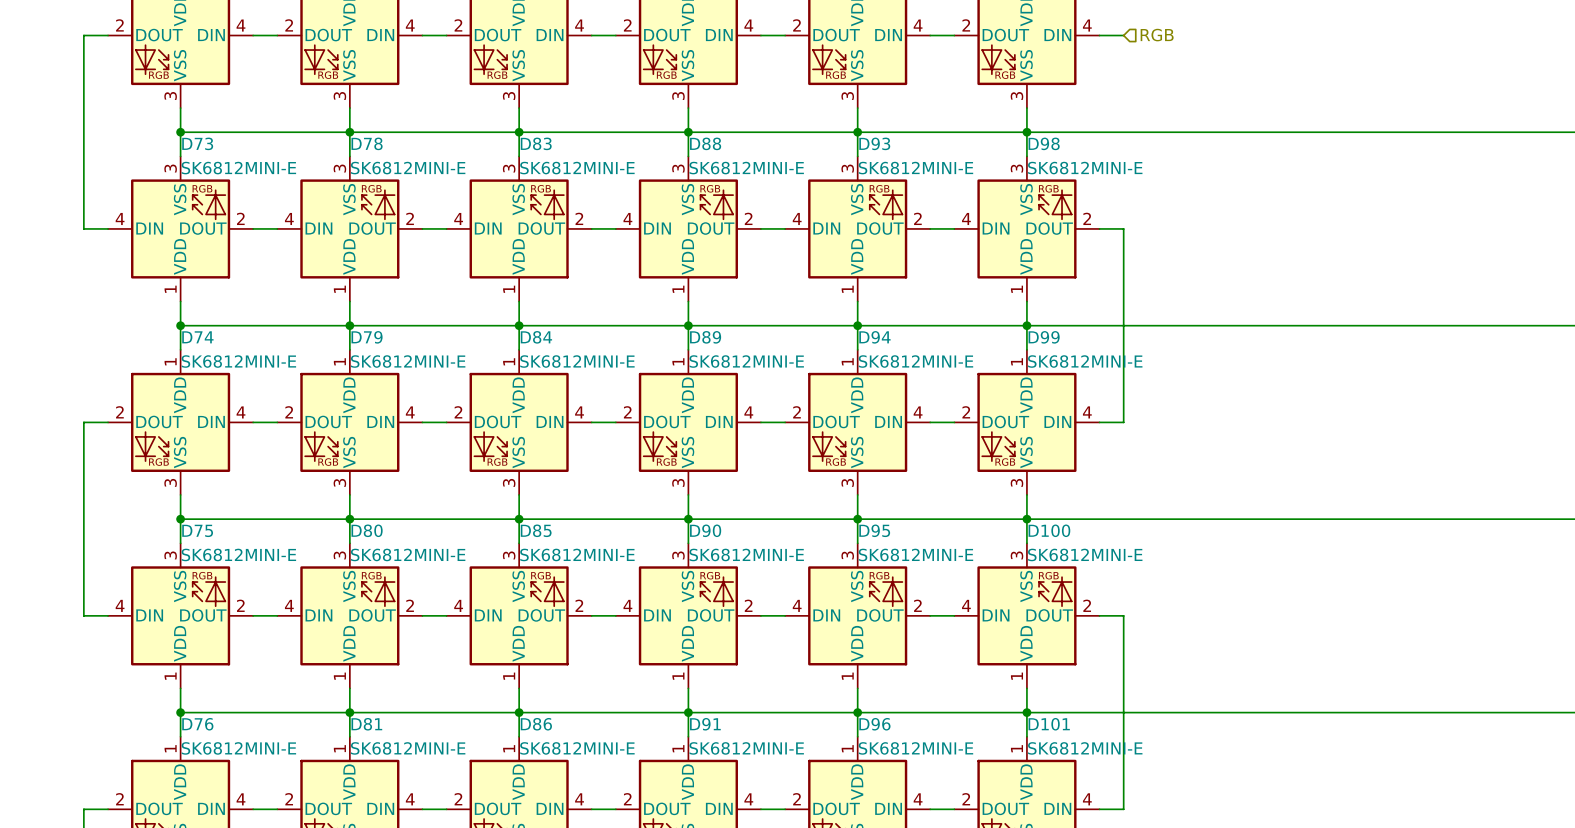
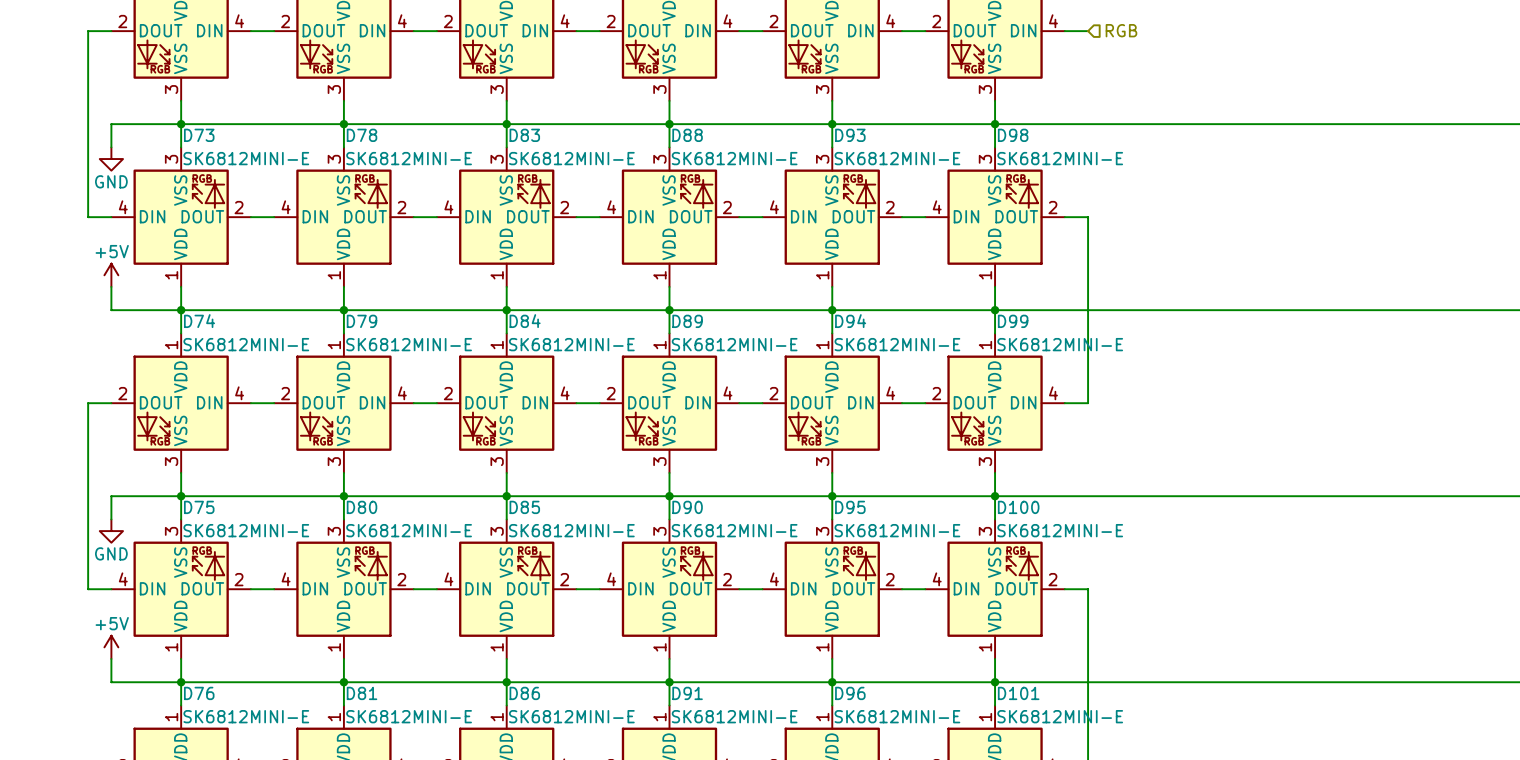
wire: none -> (181, 124) (111, 124) (111, 147)
power symbol: none -> GND (111, 159)
power symbol: none -> +5V (111, 275)
wire: none -> (111, 286) (111, 310) (181, 310)
wire: none -> (181, 496) (111, 496) (111, 519)
power symbol: none -> GND (111, 531)
power symbol: none -> +5V (111, 647)
wire: none -> (111, 658) (111, 682) (181, 682)

